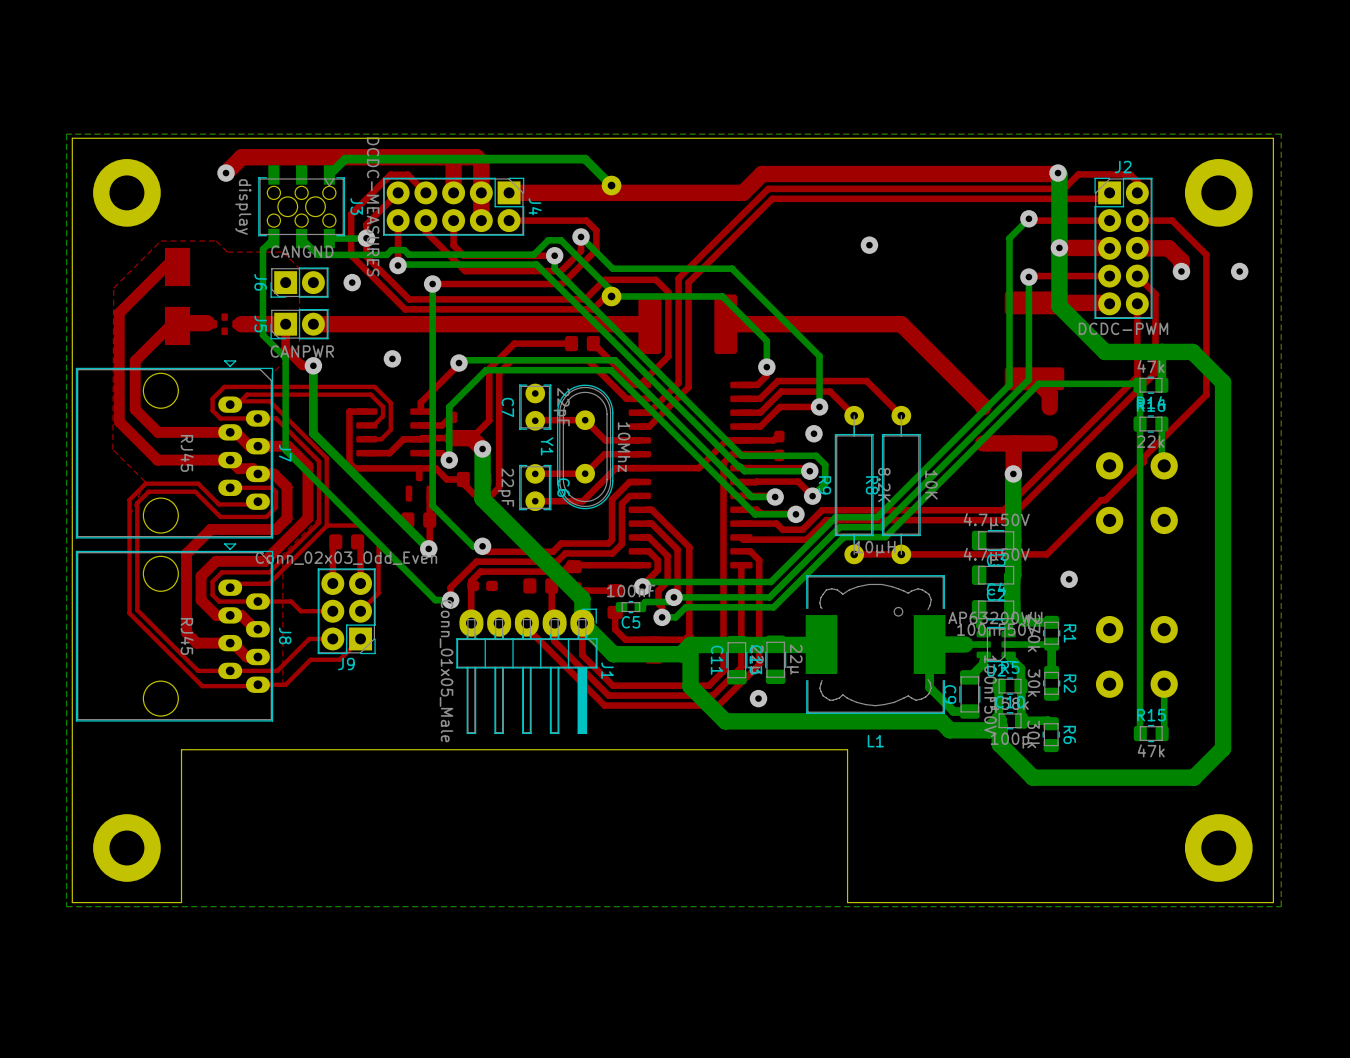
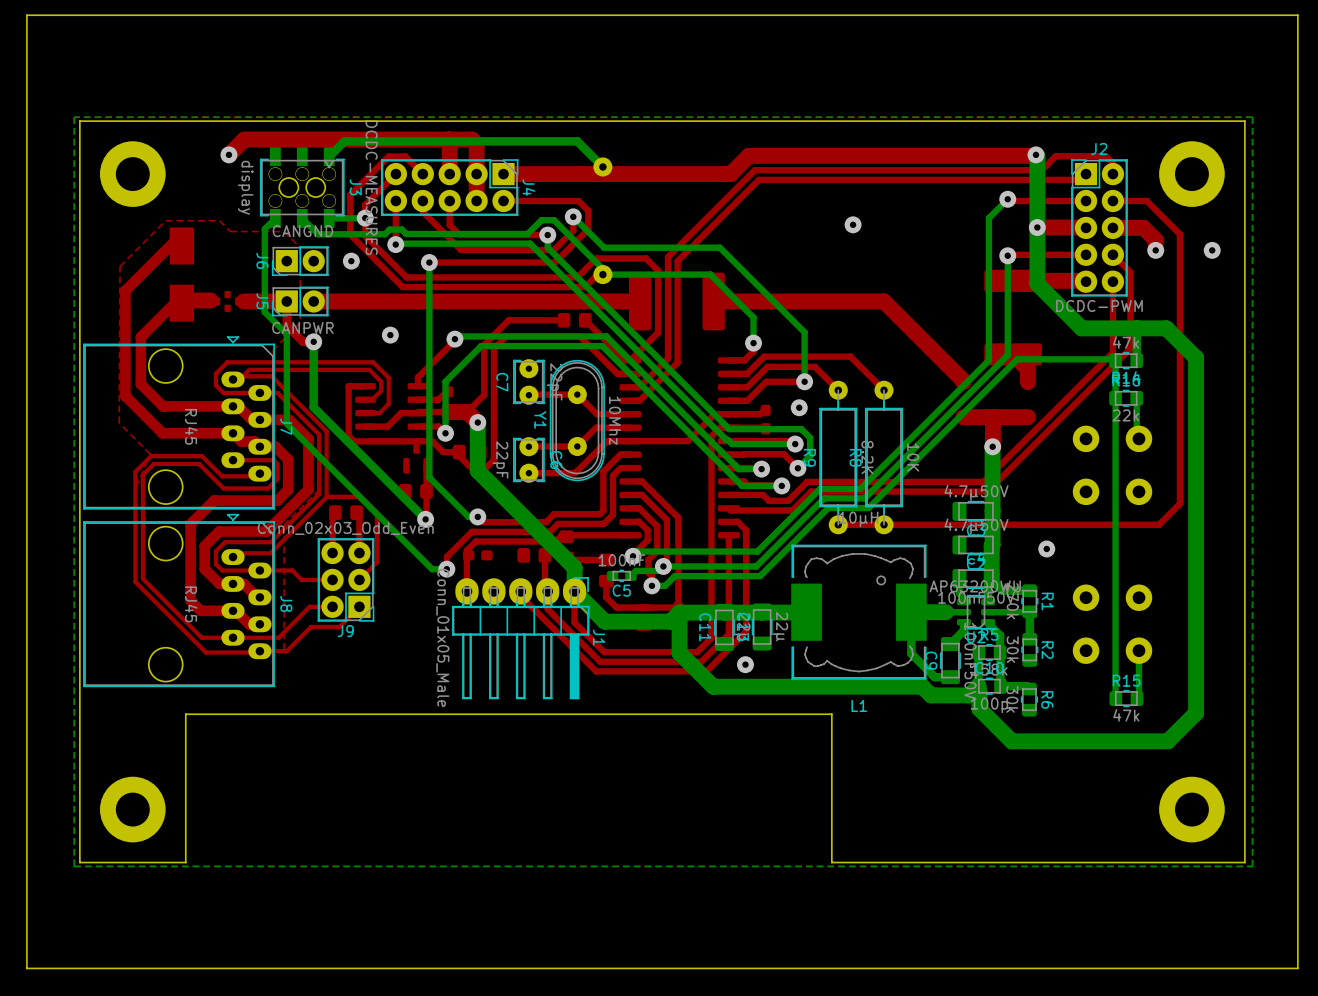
board edge: none -> (1297, 15) (26, 15) (26, 968) (1297, 968) (1297, 15)
J3 footprint: [258, 165, 346, 249] -> [260, 147, 345, 228]
top track: (1206, 394) (1143, 457) (1143, 461) (1105, 500) (1101, 500) (1046, 554) -> (1179, 370) (1179, 503) (1159, 524) (1025, 524)

